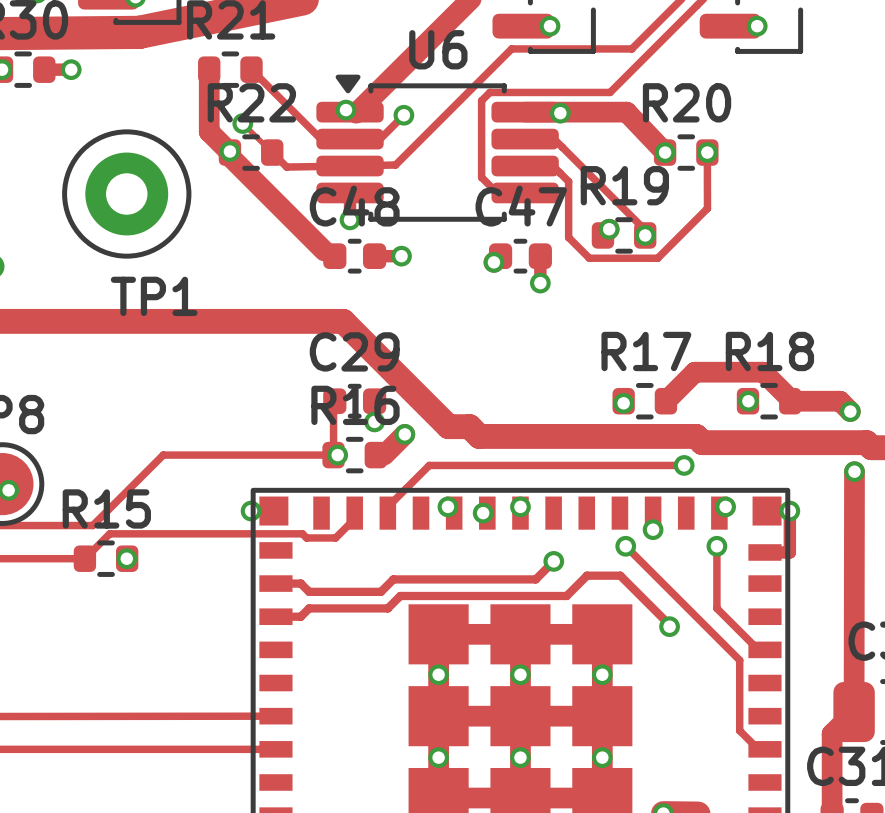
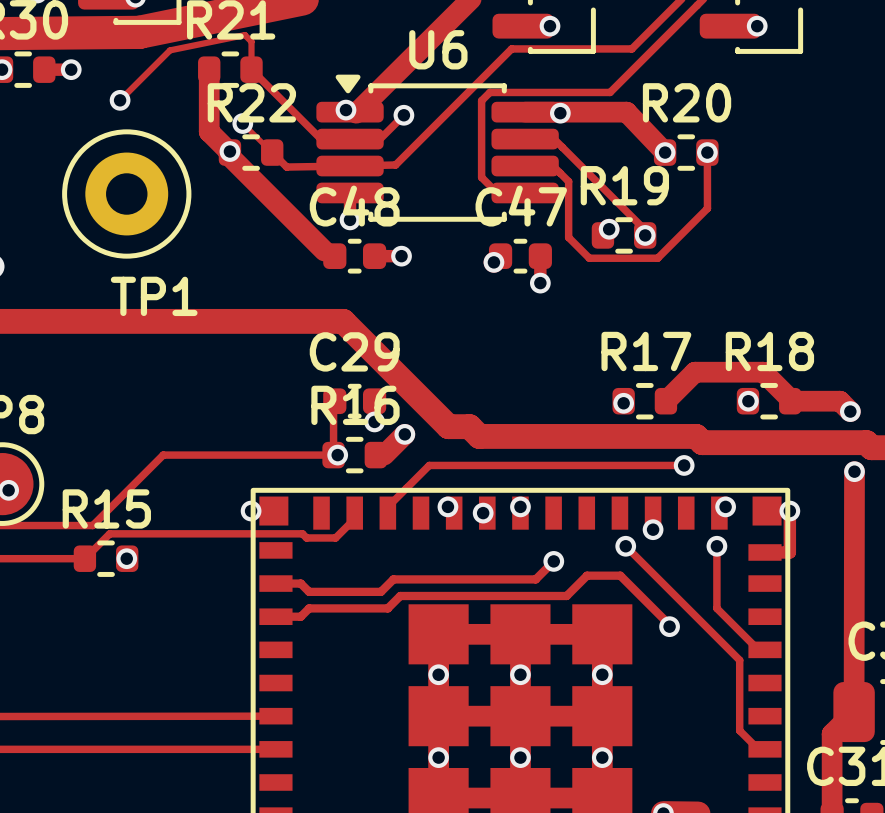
track: none -> (251, 69) (251, 41) (244, 35) (170, 50) (120, 100)
via: none -> (120, 100)

